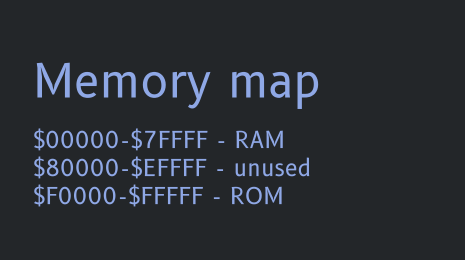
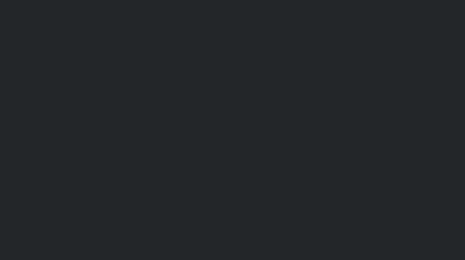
text: Memory map (177, 85) -> none
text: $00000-$7FFFF - RAM (158, 139) -> none
text: $80000-$EFFFF - unused (171, 167) -> none
text: $F0000-$FFFFF - ROM (157, 195) -> none

